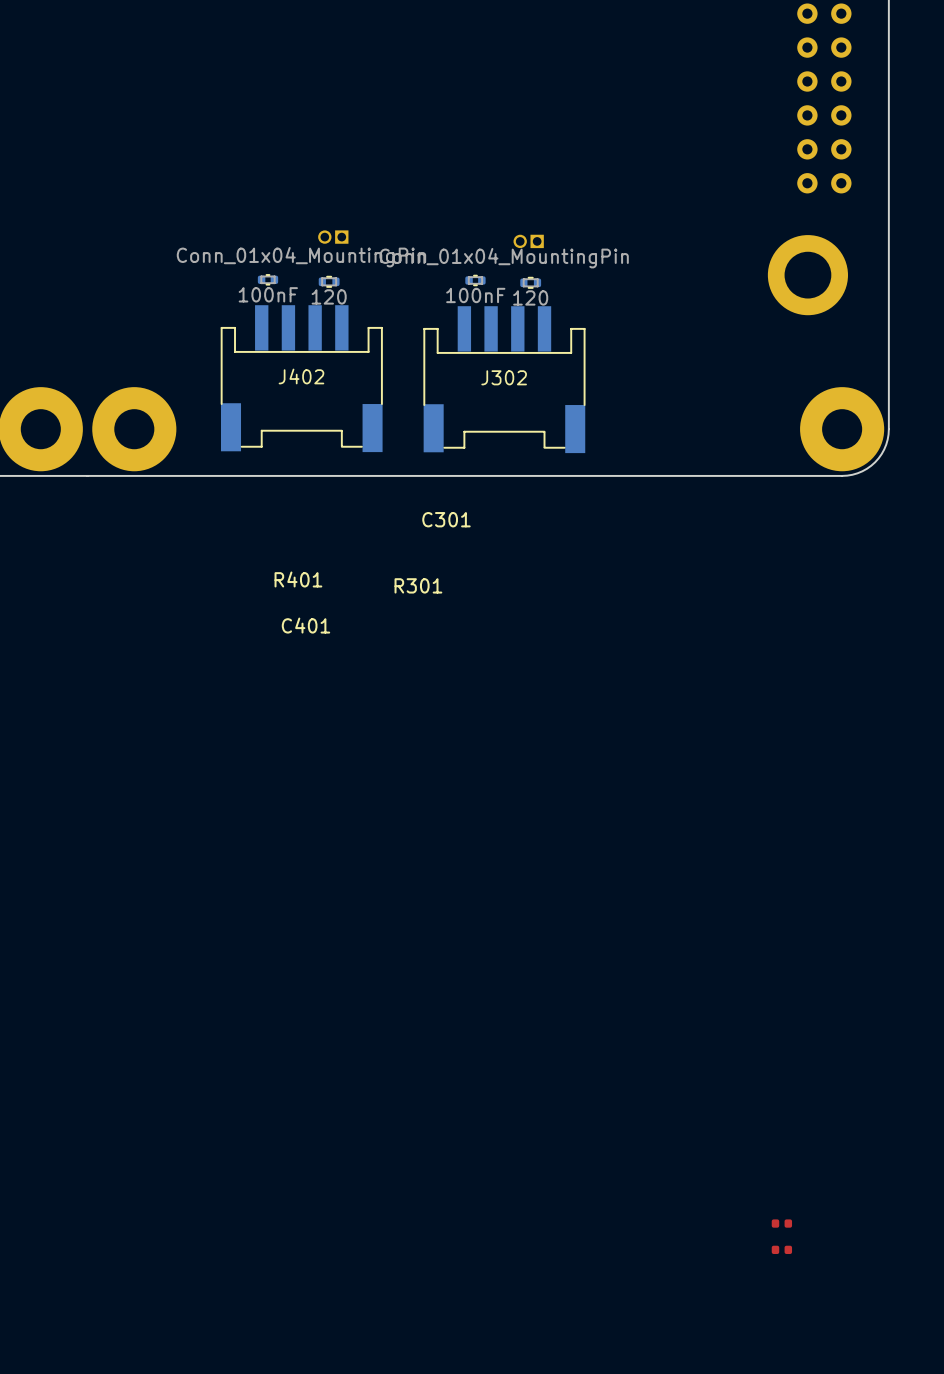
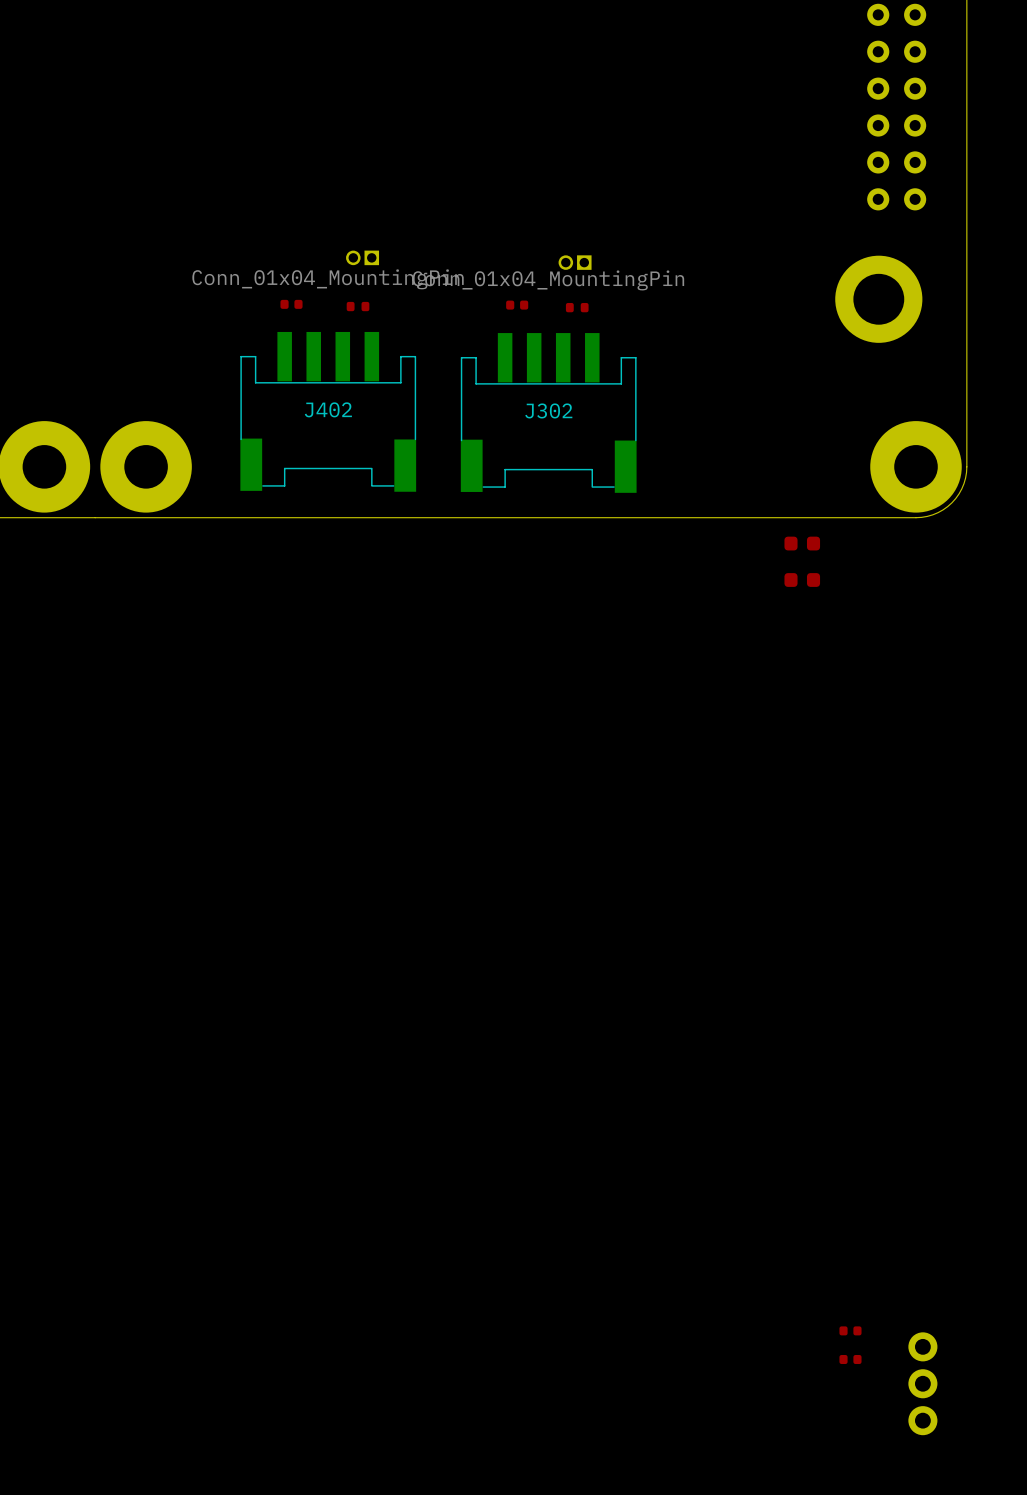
C401 side: bottom (267, 279) -> top (291, 304)
C301 side: bottom (475, 280) -> top (517, 305)
R401 side: bottom (329, 281) -> top (358, 306)
R301 side: bottom (530, 282) -> top (577, 307)
part: none -> (802, 543)
part: none -> (802, 580)
part: none -> (922, 1383)

